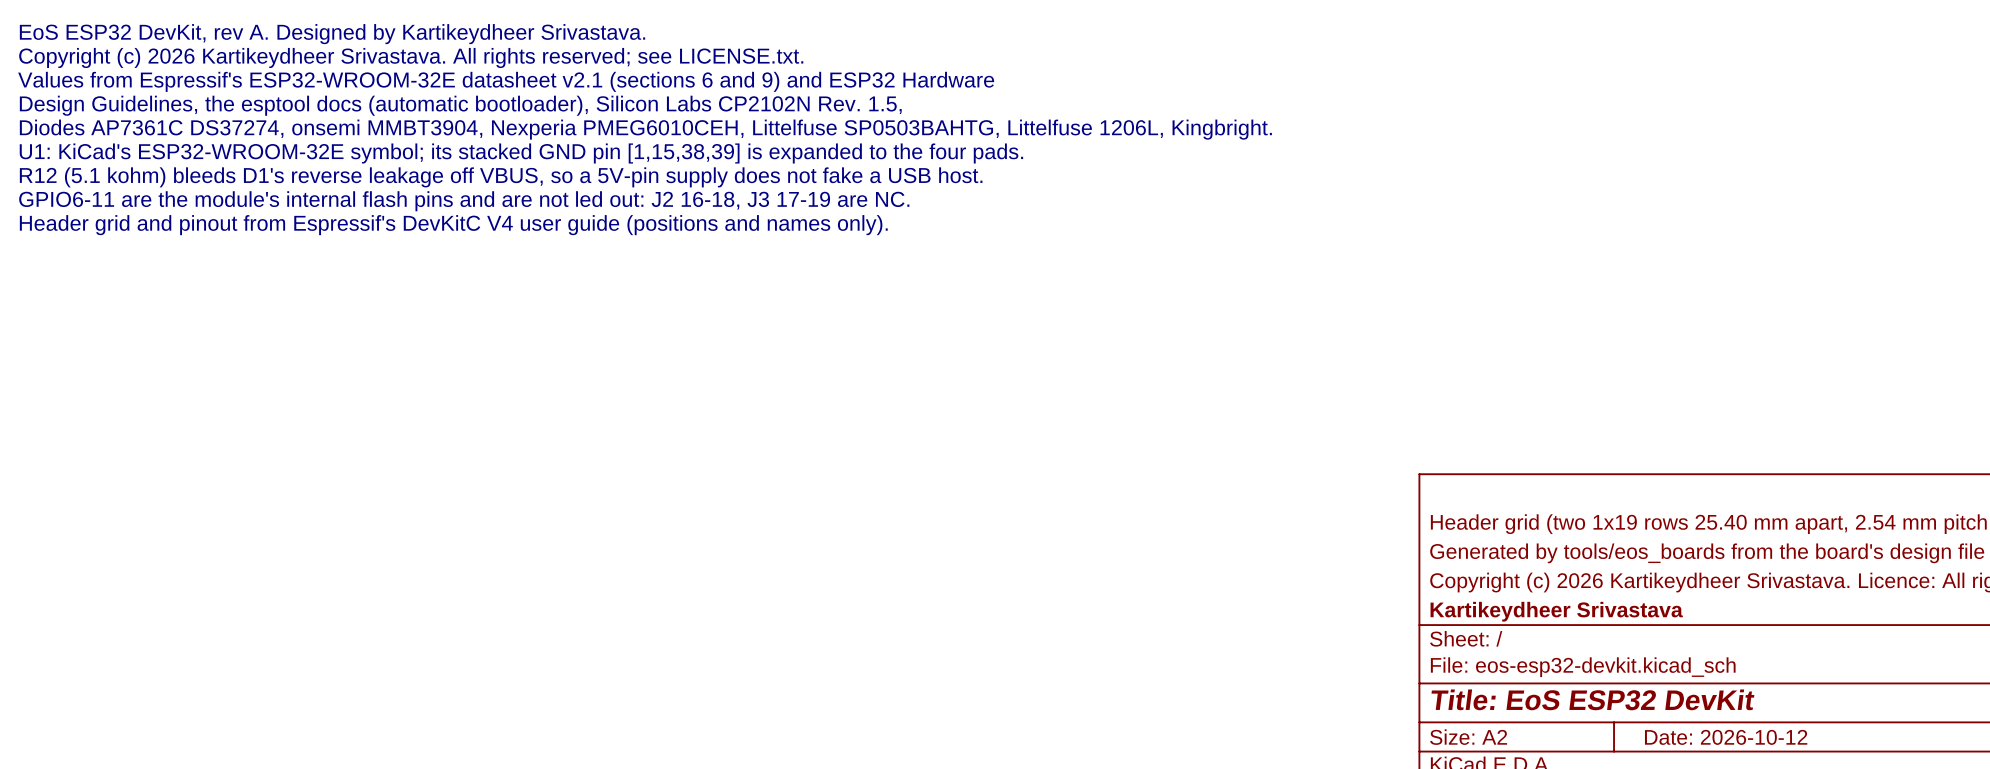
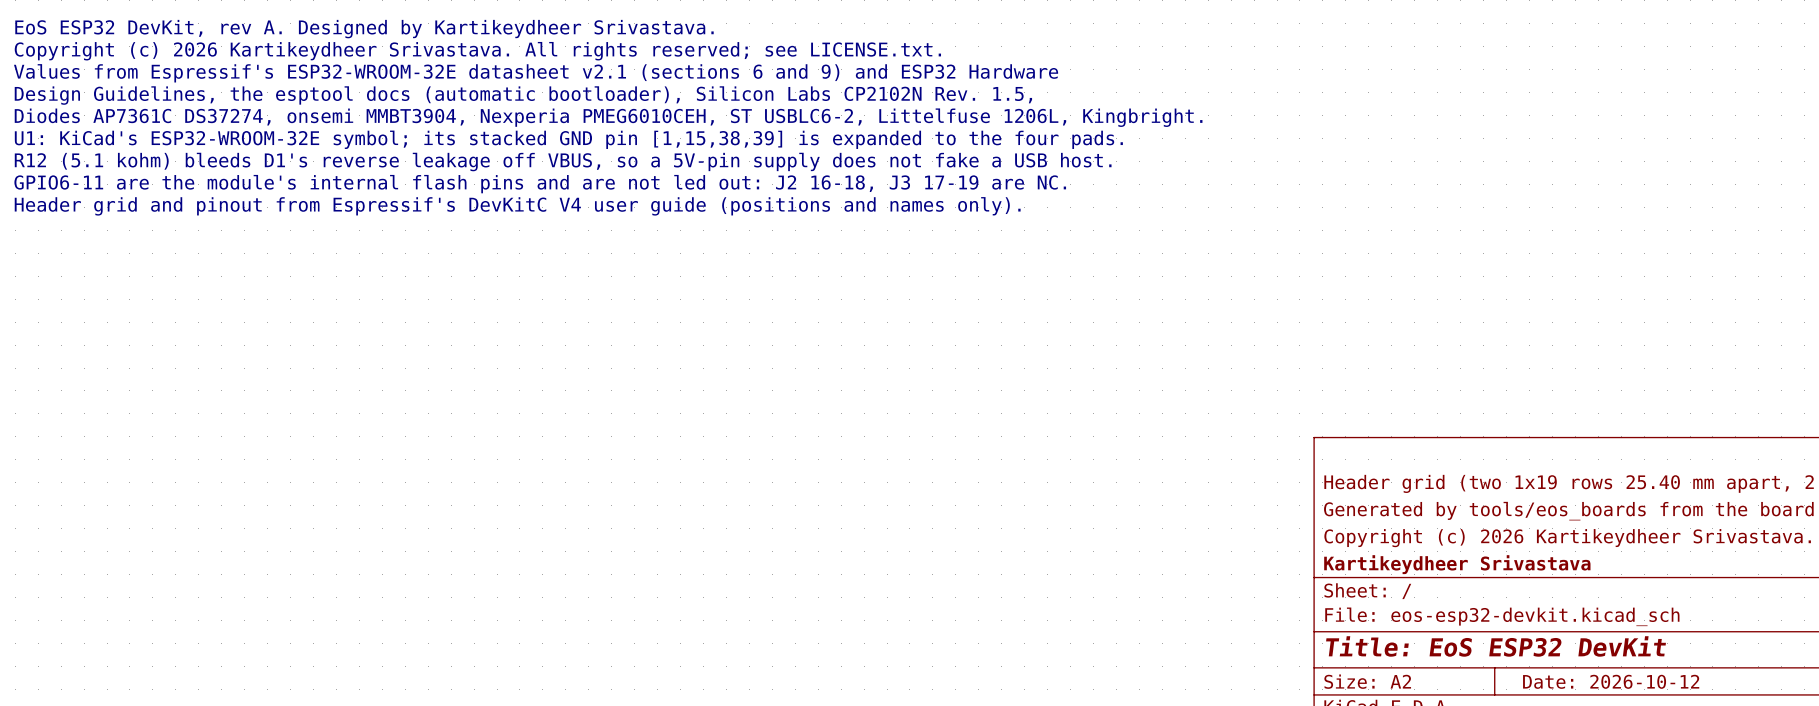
text: Diodes AP7361C DS37274, onsemi MMBT3904, Nexperia PMEG6010CEH, Littelfuse SP0503BAHTG, Littelfuse 1206L, Kingbright. (645, 129) -> Diodes AP7361C DS37274, onsemi MMBT3904, Nexperia PMEG6010CEH, ST USBLC6-2, Littelfuse 1206L, Kingbright. (608, 117)

